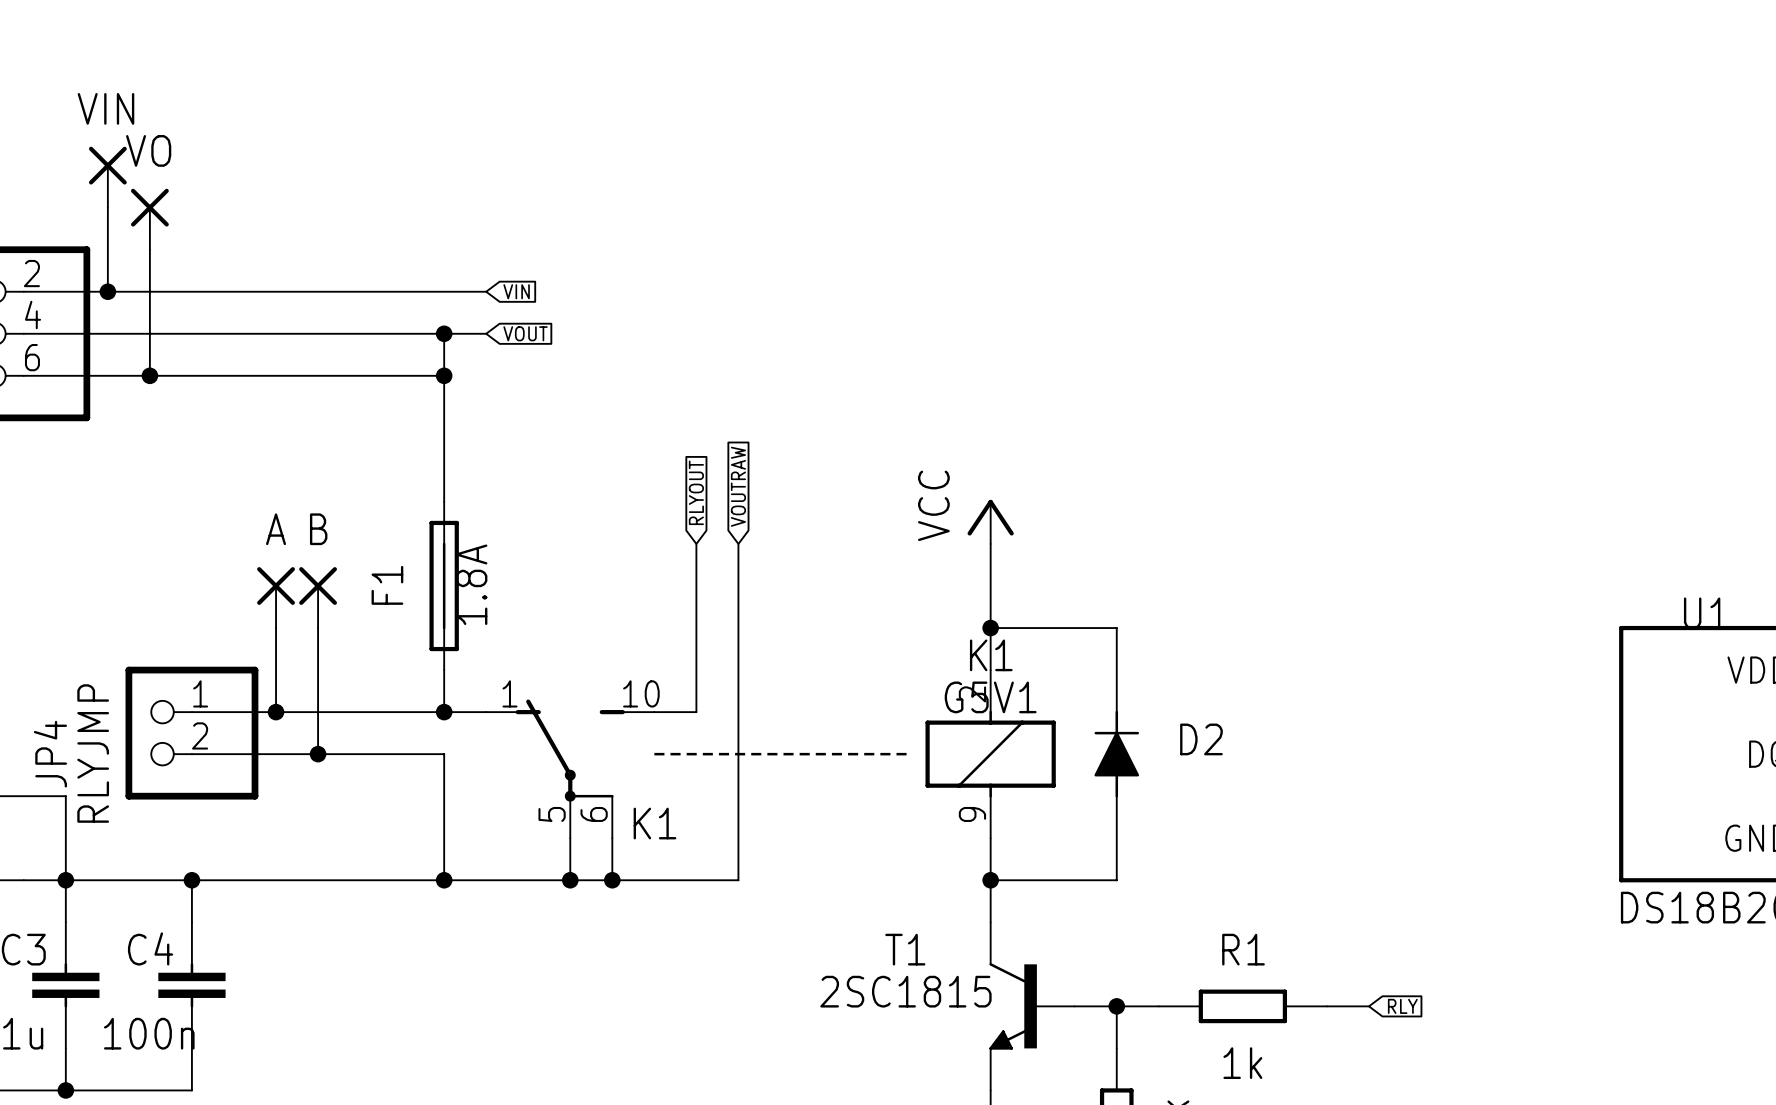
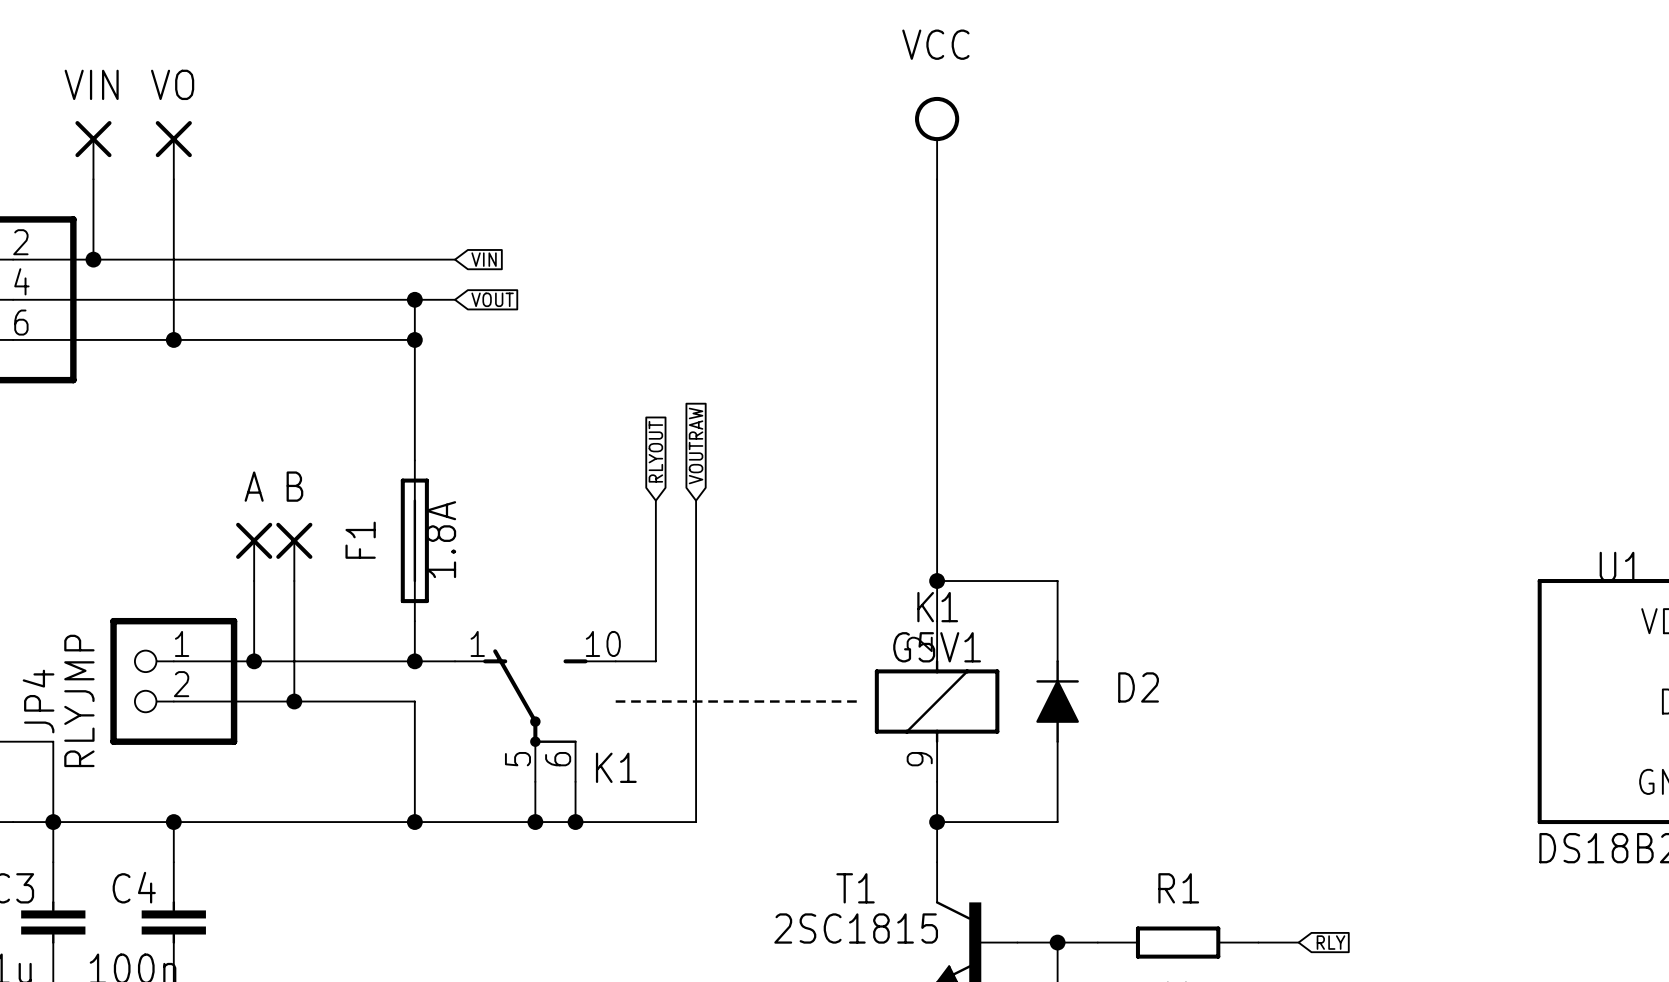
power symbol: none -> VCC (937, 138)
wire: none -> (173, 179) (173, 339)
wire: none -> (937, 179) (937, 500)
VO position: (149, 219) -> (173, 150)
wire: (149, 249) (149, 375) -> none
junction position: (149, 375) -> (173, 339)
power symbol: VCC (990, 521) -> none

